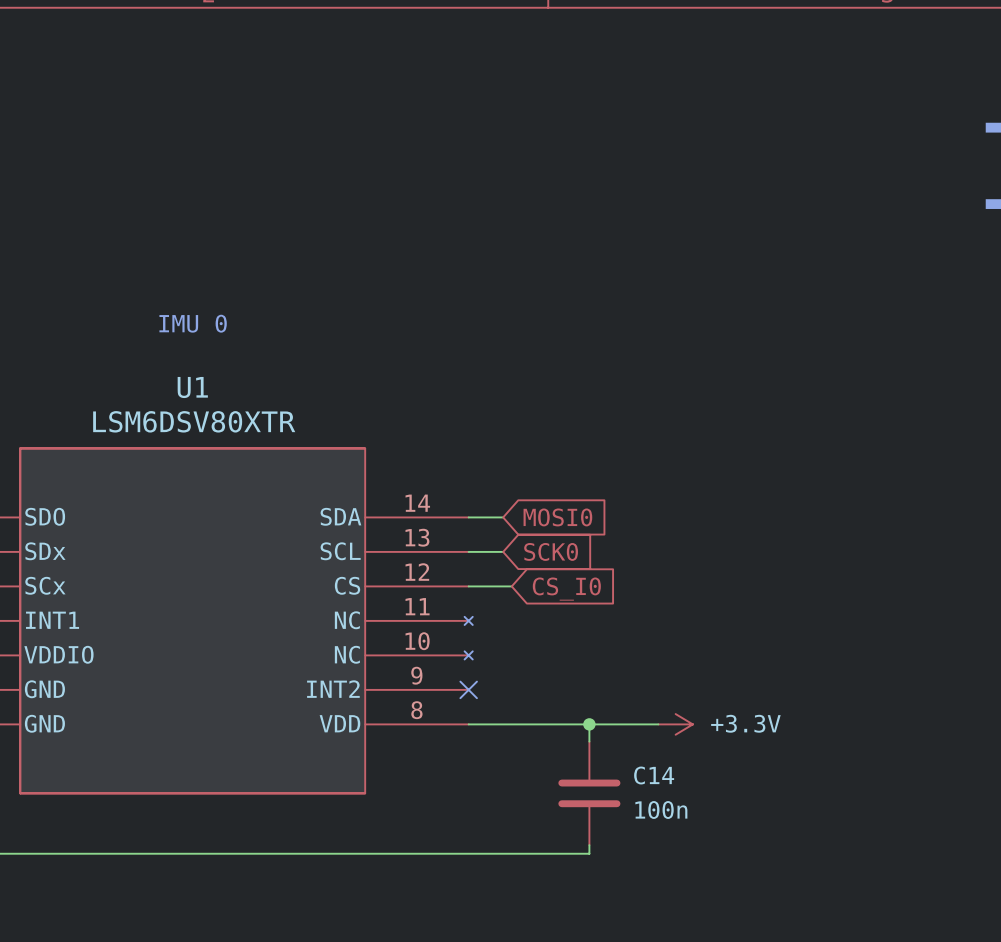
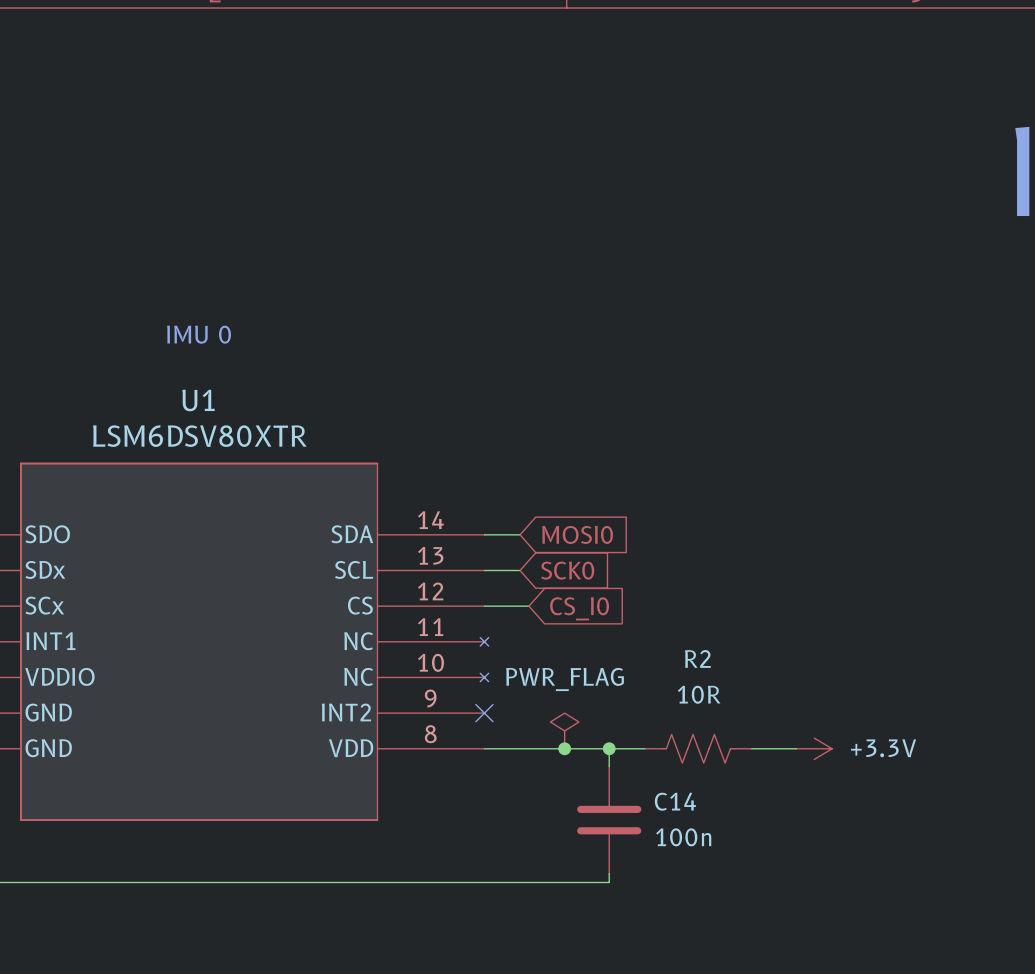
power symbol: none -> PWR_FLAG (564, 730)
junction: none -> (564, 748)
power symbol position: +3.3V (675, 724) -> +3.3V (814, 748)
R2: none -> 10R (698, 748)
wire: none -> (751, 748) (796, 748)

